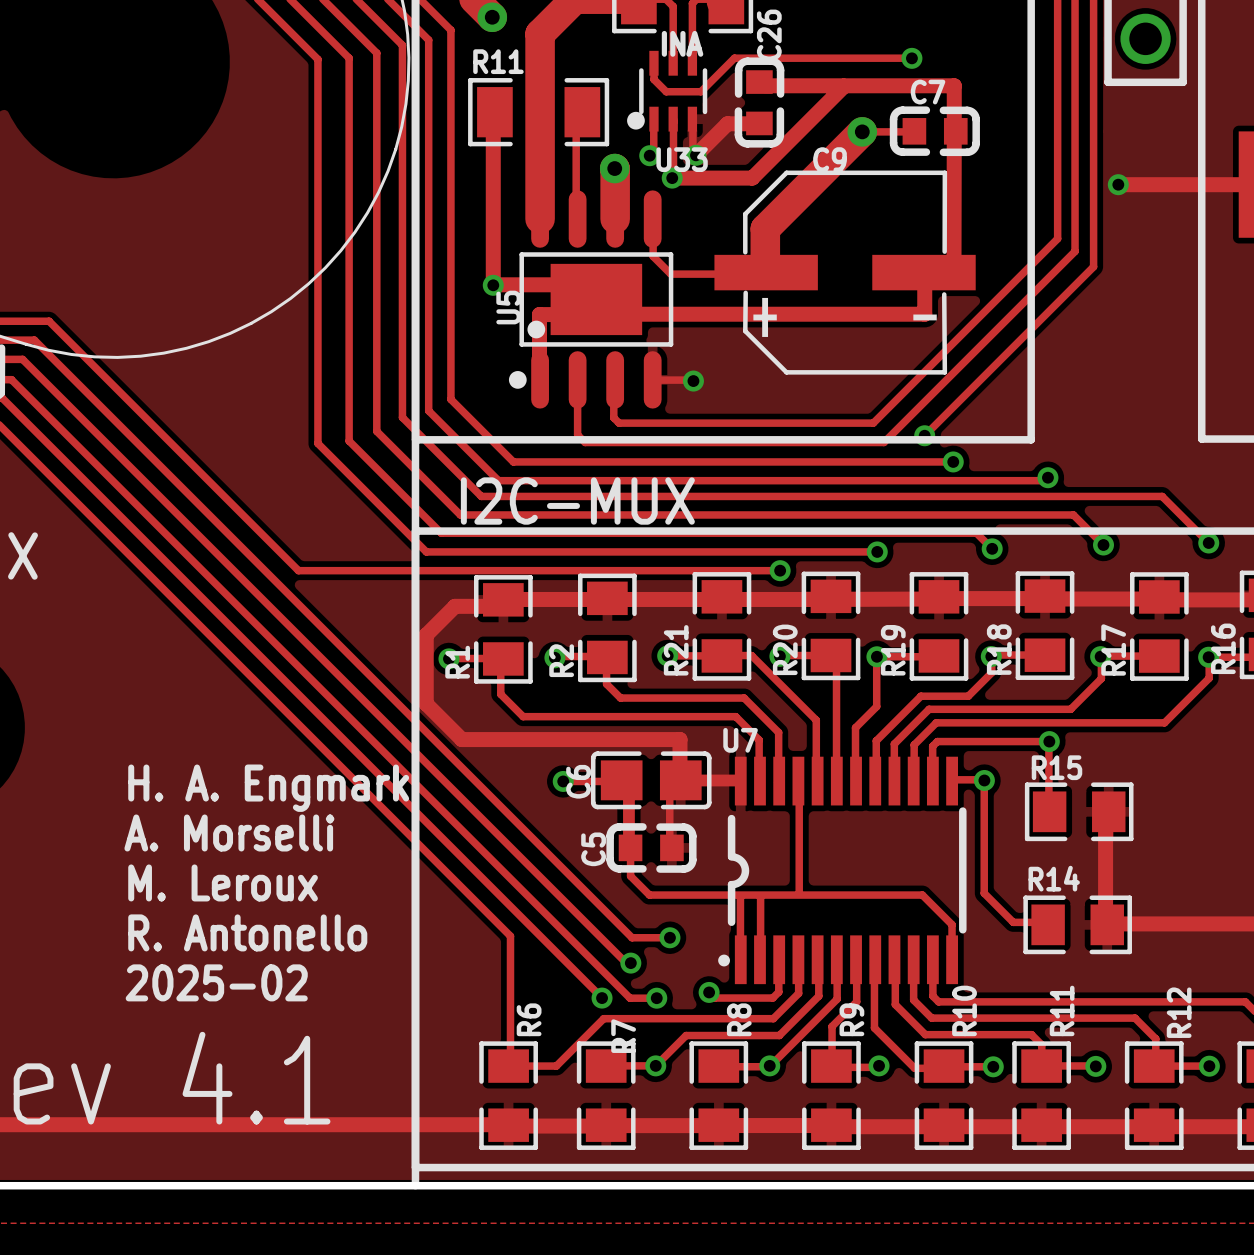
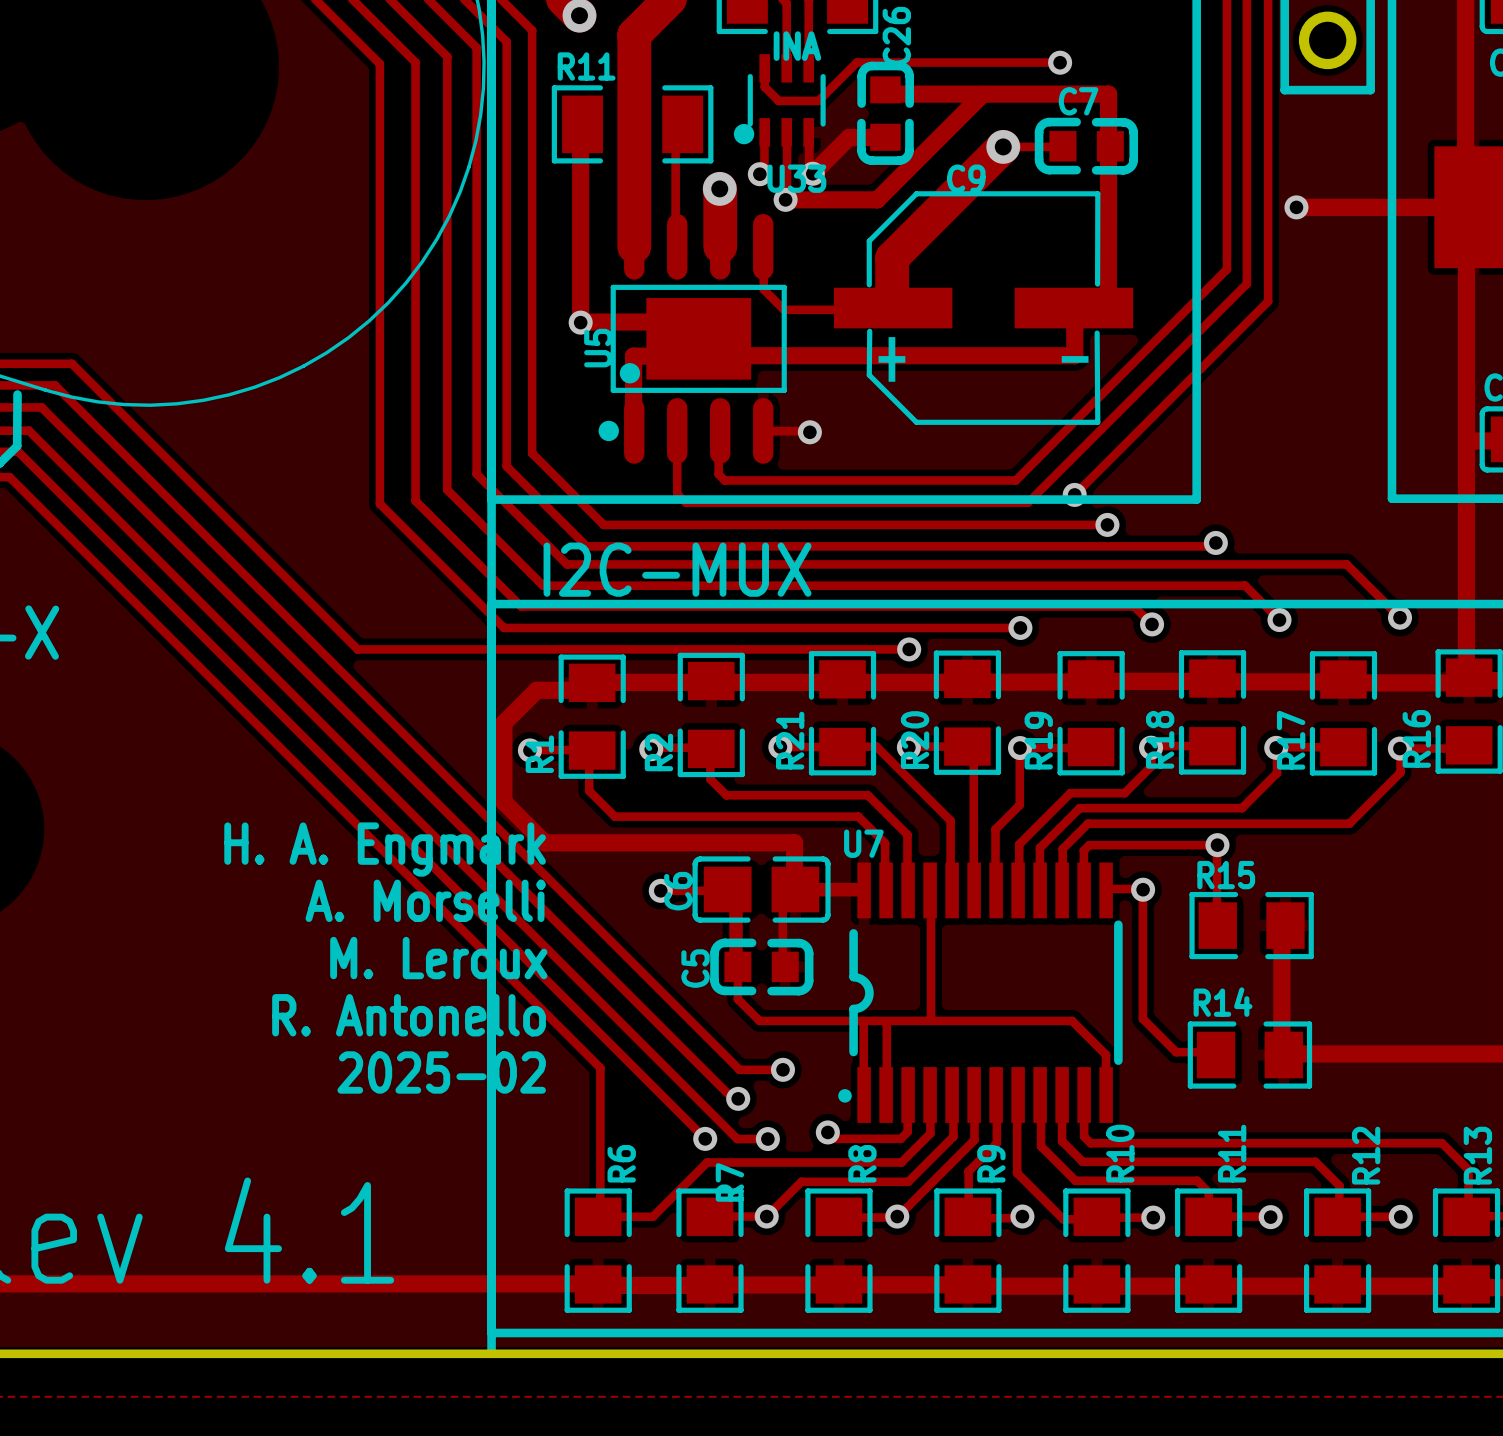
text position: H. A. Engmark (268, 788) -> H. A. Engmark (385, 849)
text position: A. Morselli (229, 832) -> A. Morselli (425, 900)
text position: M. Leroux (223, 882) -> M. Leroux (438, 958)
text position: R. Antonello (247, 932) -> R. Antonello (409, 1015)
text position: 2025-02 (216, 982) -> 2025-02 (441, 1072)

